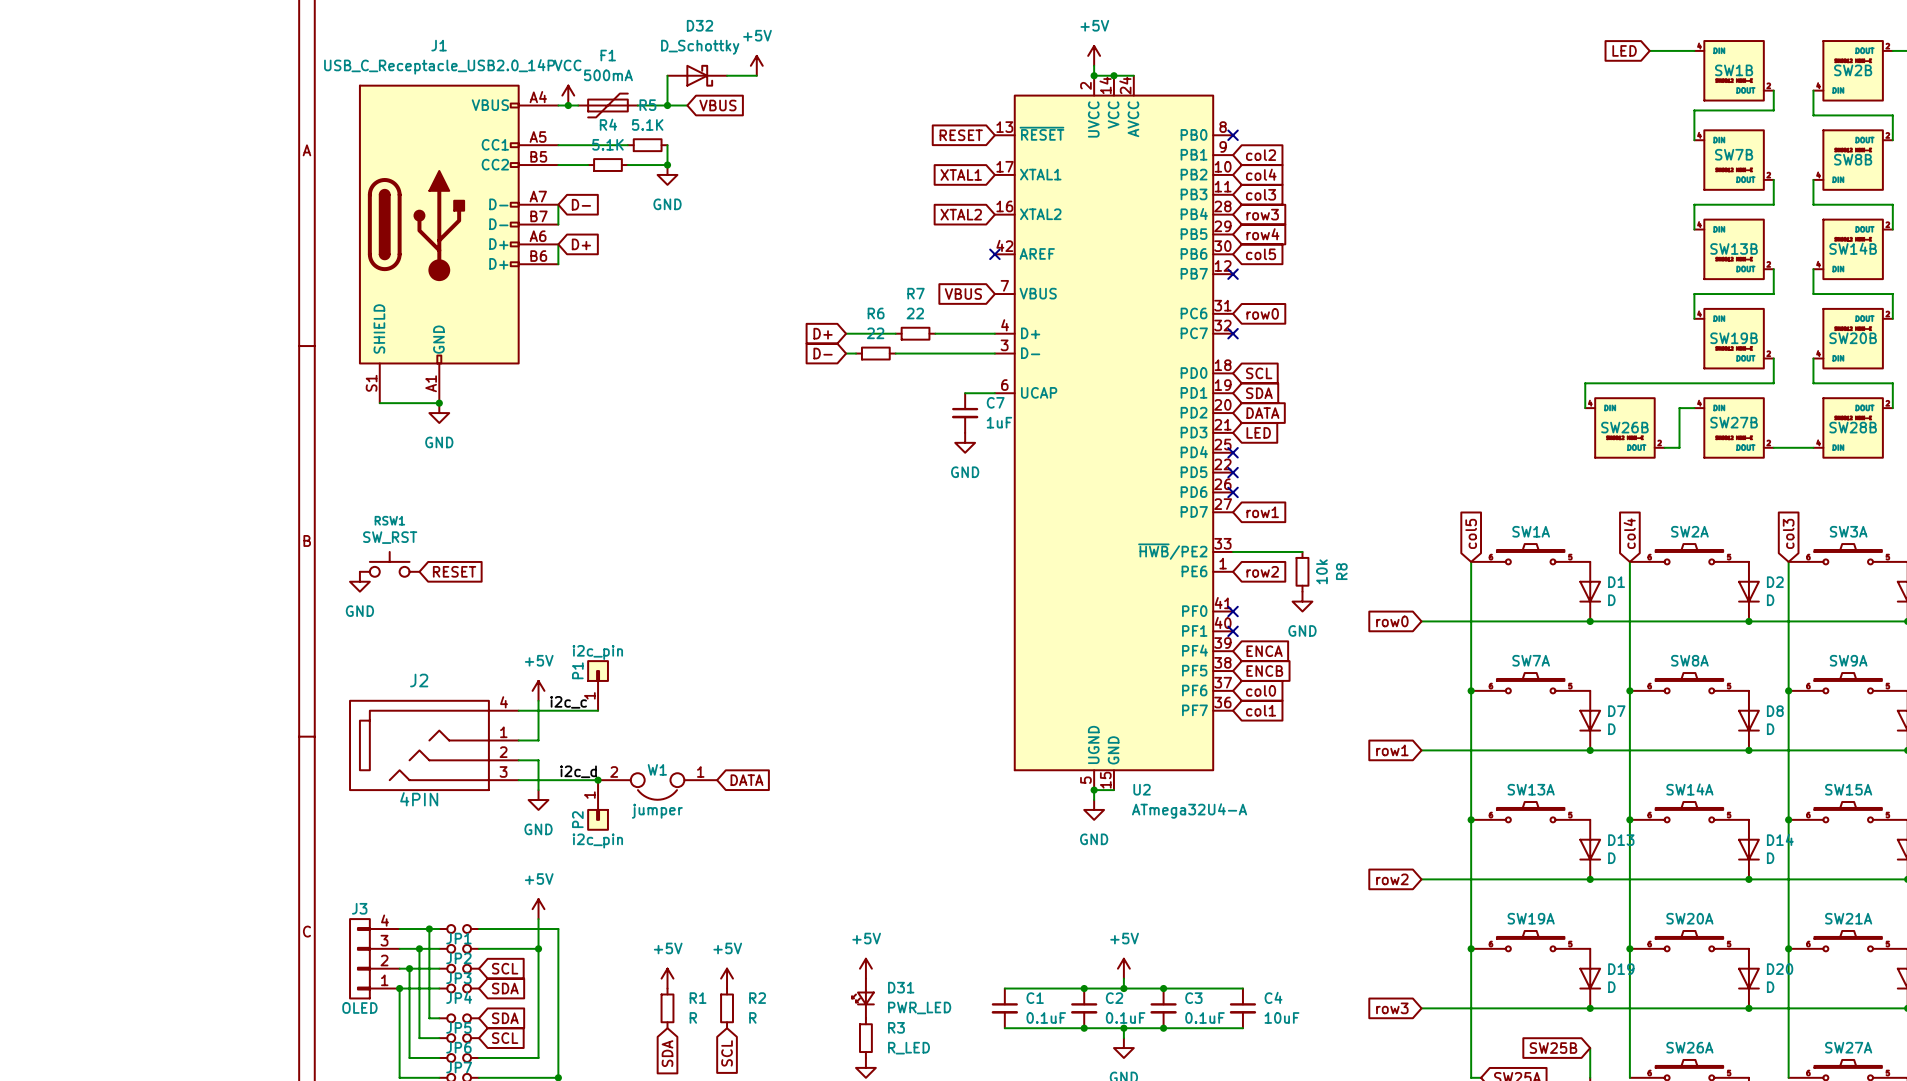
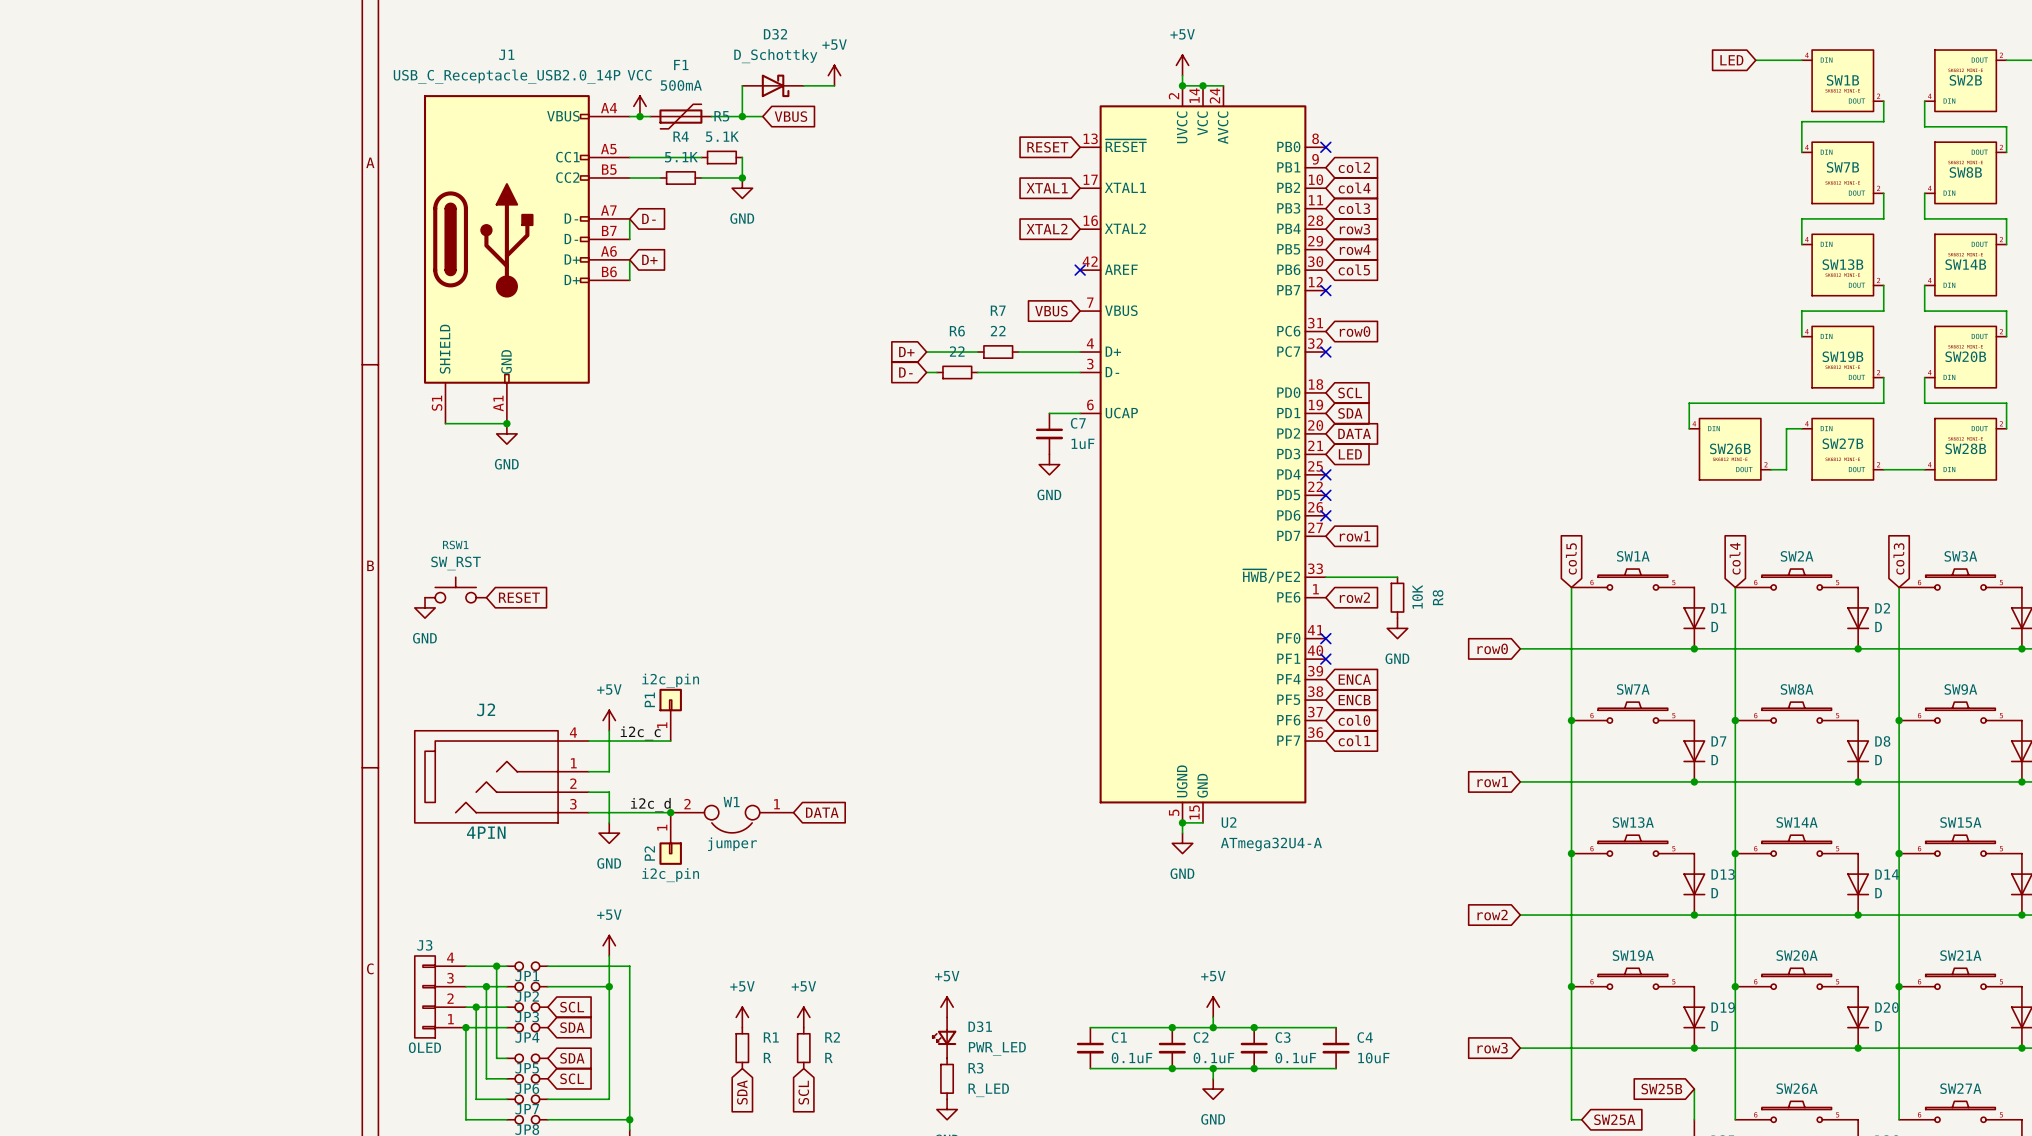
R8 value: 10k (1321, 571) -> 10K (1417, 596)

